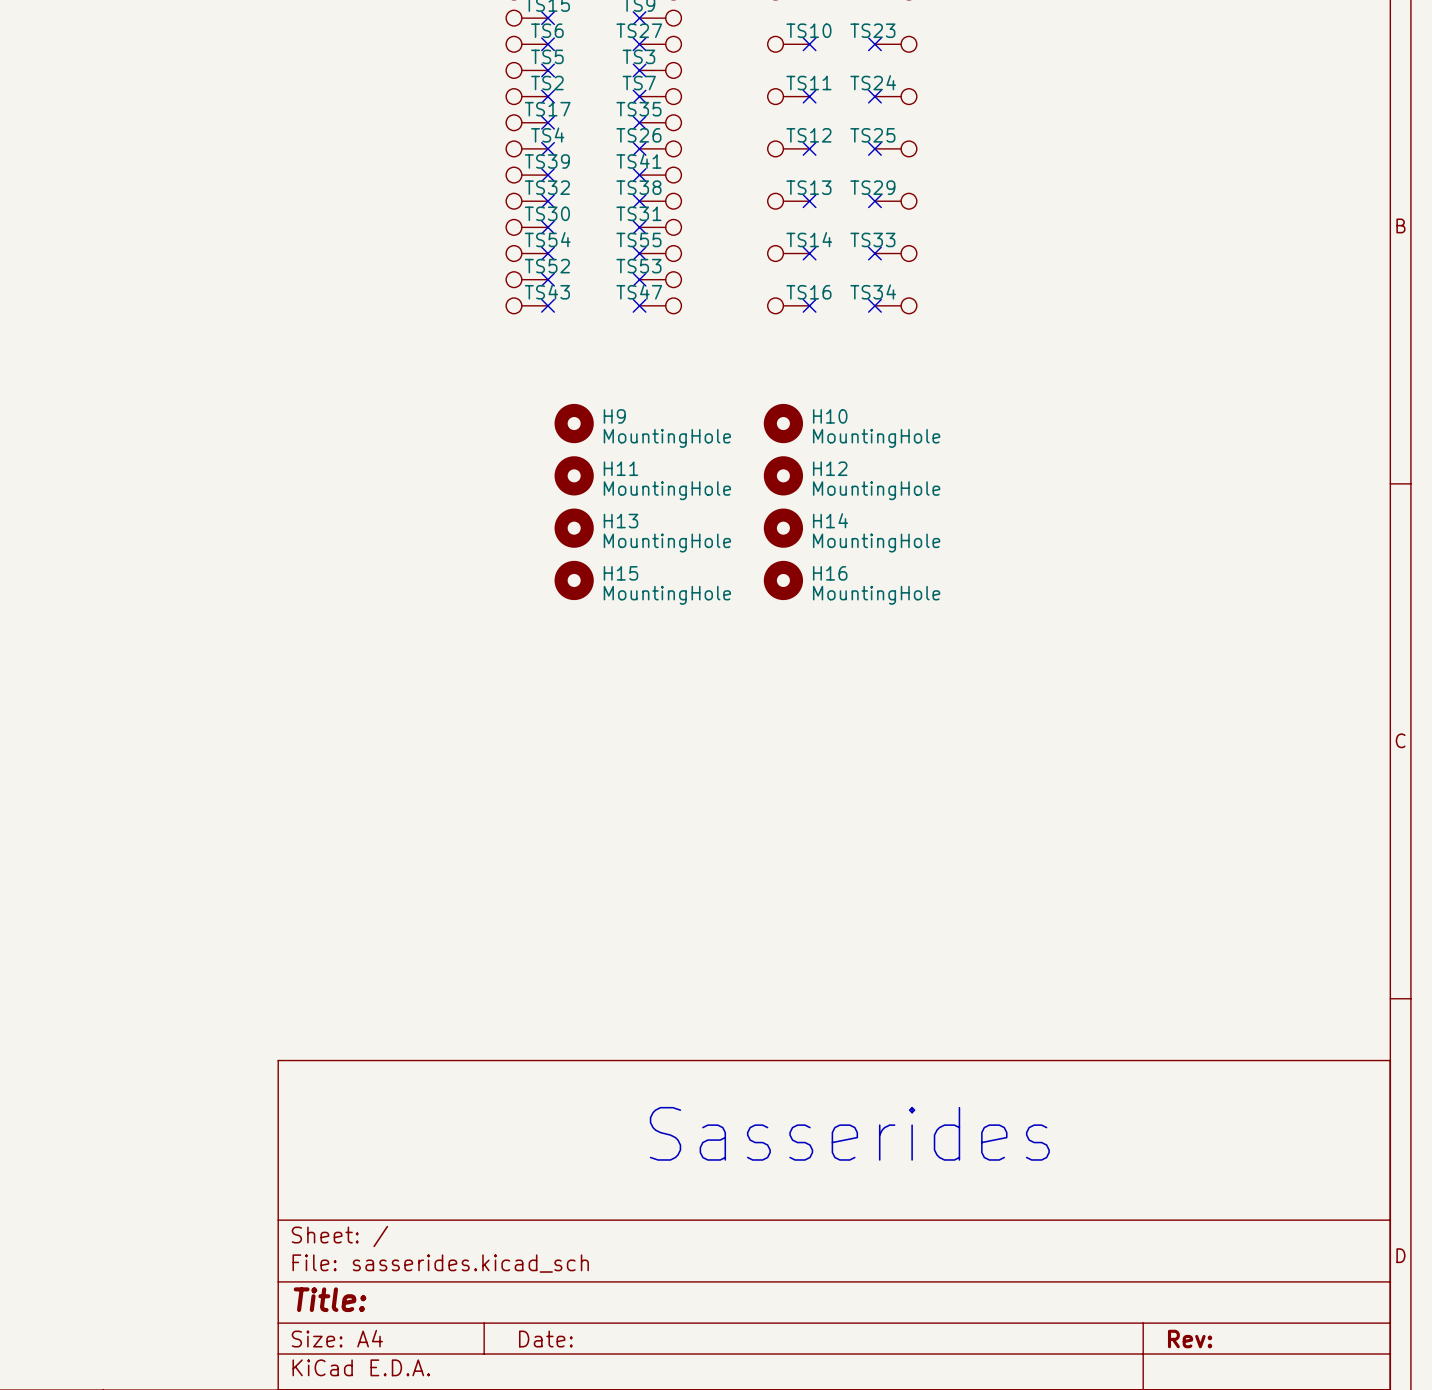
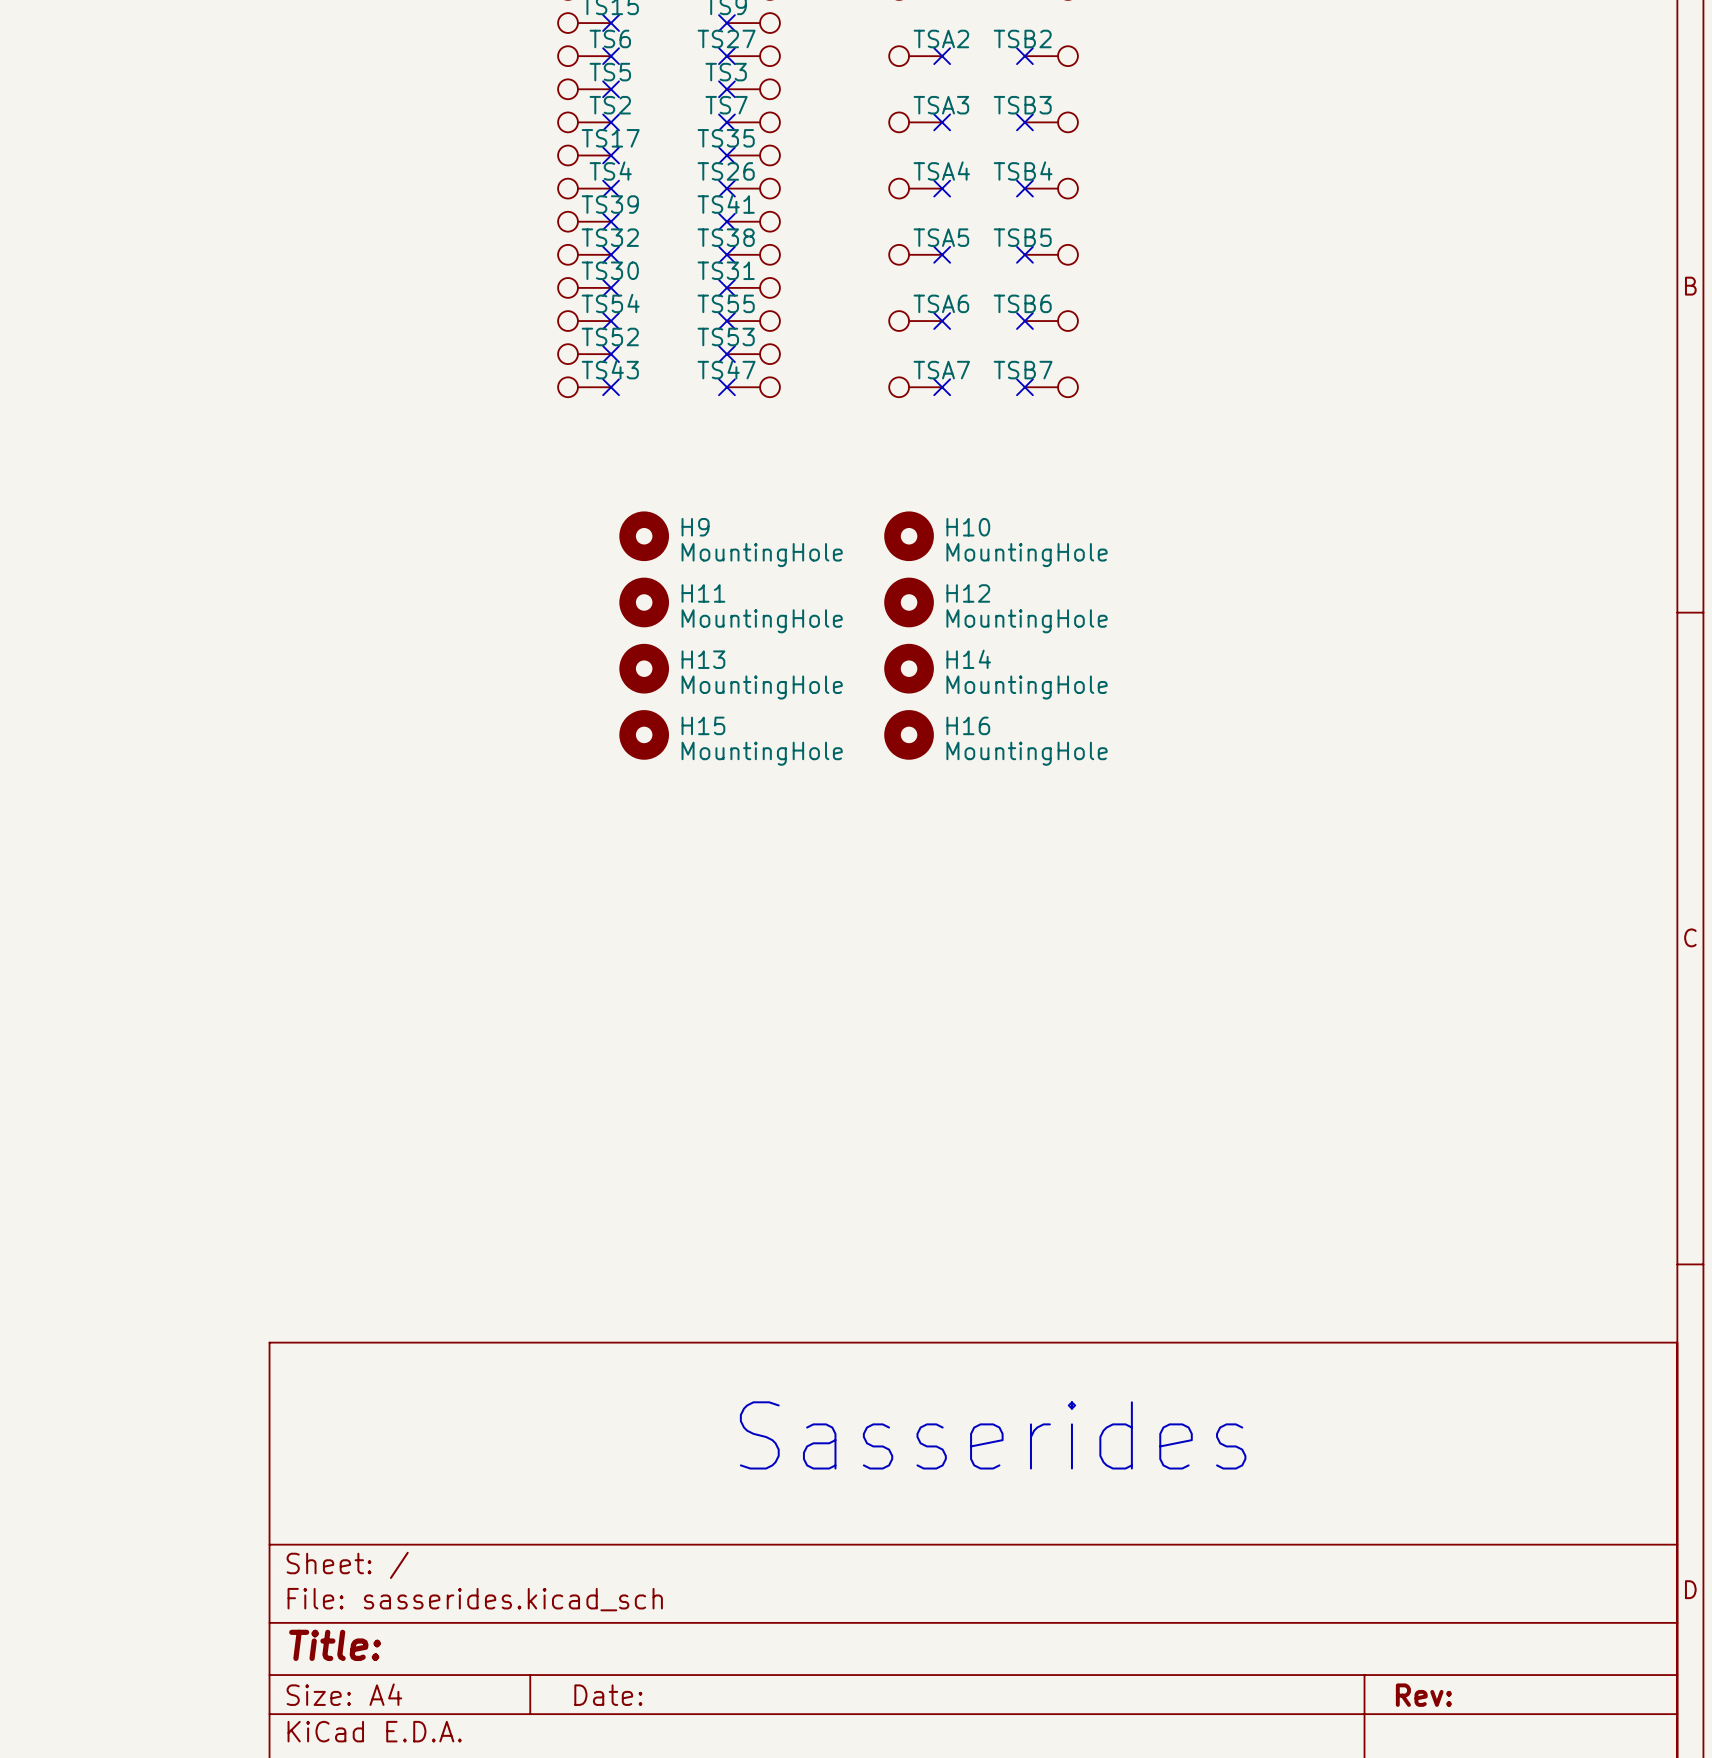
TS10 name: TS10 (808, 30) -> TSA2 (941, 38)
TS23 name: TS23 (872, 30) -> TSB2 (1022, 38)
TS24 name: TS24 (873, 82) -> TSB3 (1022, 105)
TS11 name: TS11 (808, 83) -> TSA3 (941, 105)
TS12 name: TS12 (808, 135) -> TSA4 (941, 171)
TS25 name: TS25 (872, 135) -> TSB4 (1023, 171)
TS13 name: TS13 (808, 187) -> TSA5 (941, 237)
TS29 name: TS29 (872, 187) -> TSB5 (1022, 237)
TS14 name: TS14 (809, 239) -> TSA6 (941, 303)
TS33 name: TS33 (872, 239) -> TSB6 (1022, 303)
TS34 name: TS34 (873, 291) -> TSB7 (1023, 370)
TS16 name: TS16 (808, 292) -> TSA7 (941, 370)

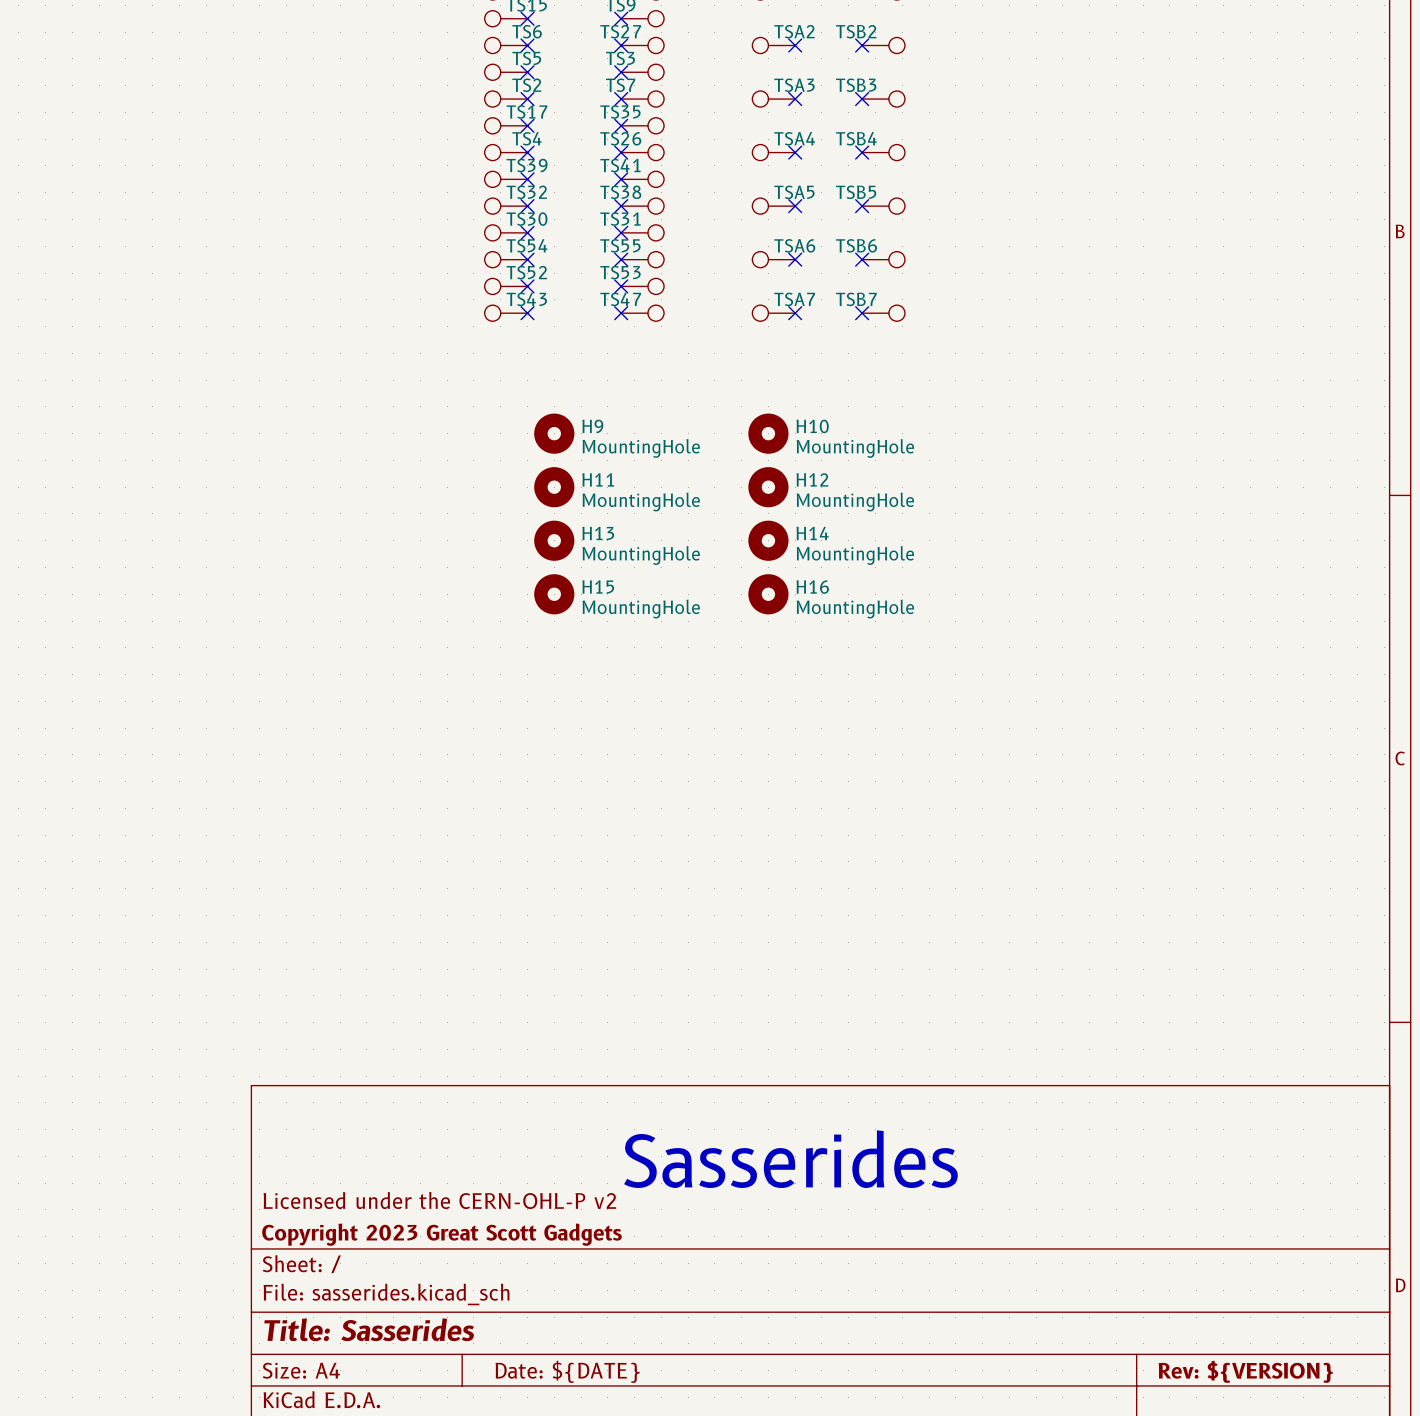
title block: none -> Licensed under the CERN-OHL-P v2 (439, 1200)
title block: none -> Copyright 2023 Great Scott Gadgets (441, 1234)
title block: Title: (335, 1645) -> Title: Sasserides (369, 1329)
title block: Date: (608, 1695) -> Date: ${DATE} (567, 1371)
title block: Rev: (1423, 1695) -> Rev: ${VERSION} (1245, 1371)

